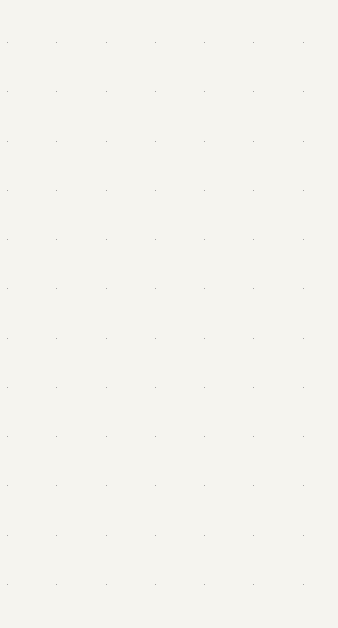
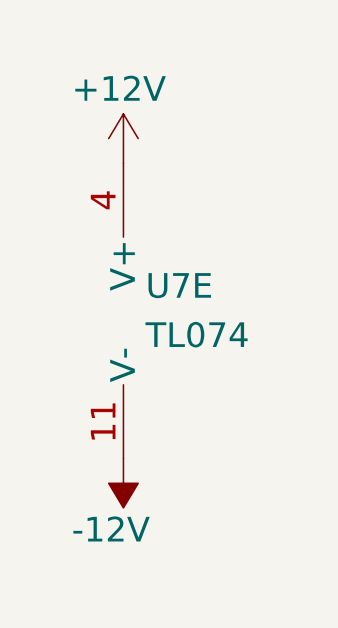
power symbol: none -> +12V (123, 138)
U7E: none -> TL074 (123, 310)
power symbol: none -> -12V (123, 483)

